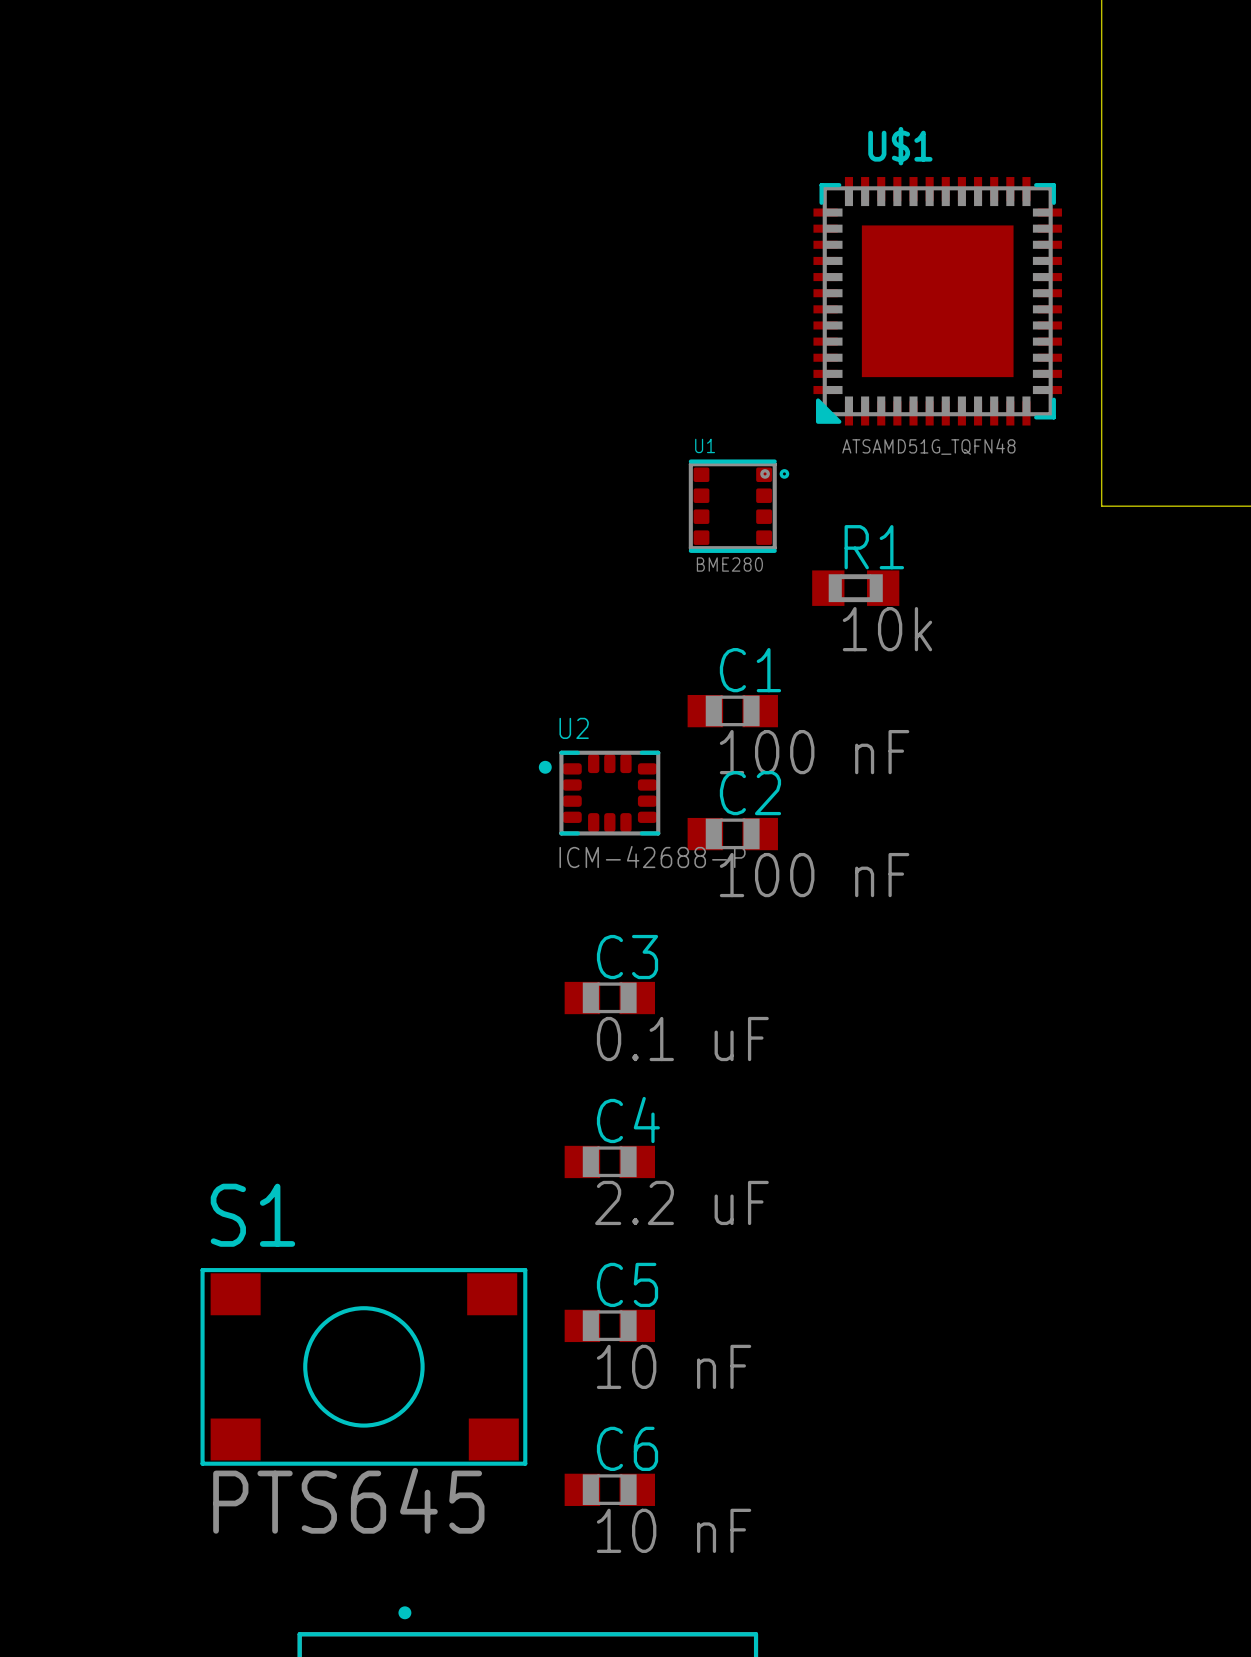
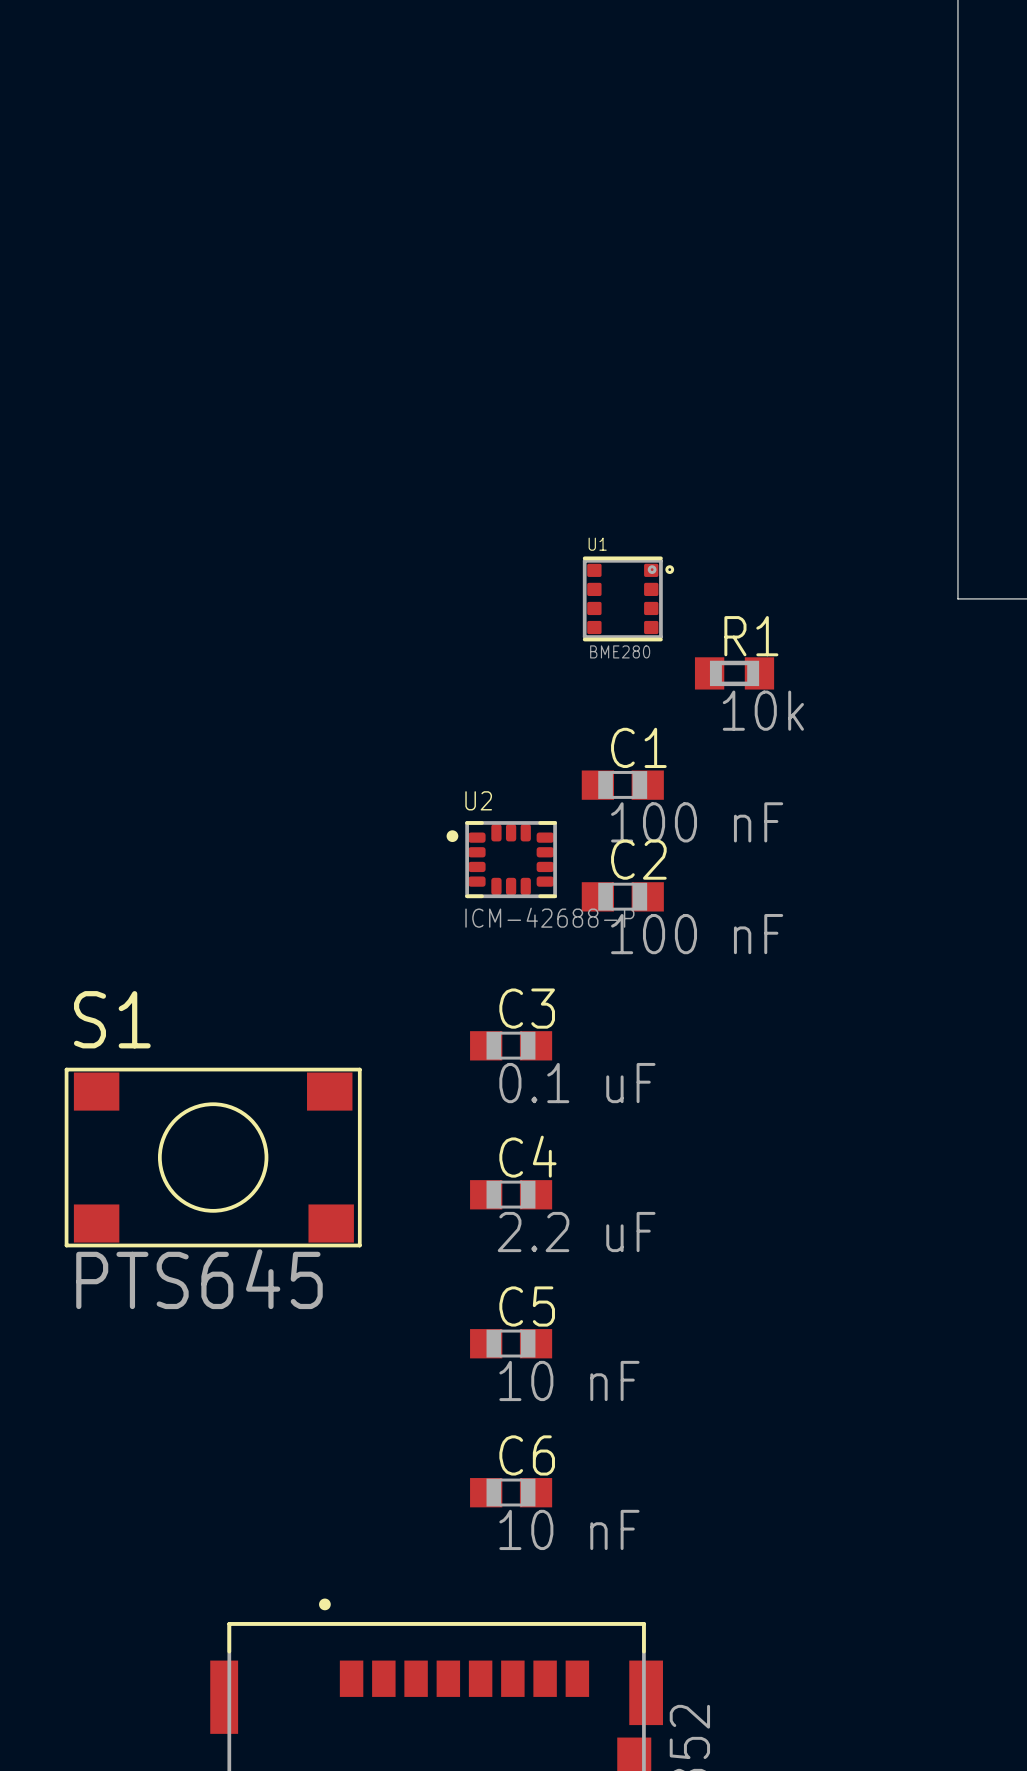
U$1: ATSAMD51G_TQFN48 (937, 301) -> none
S1 position: (363, 1366) -> (213, 1157)

